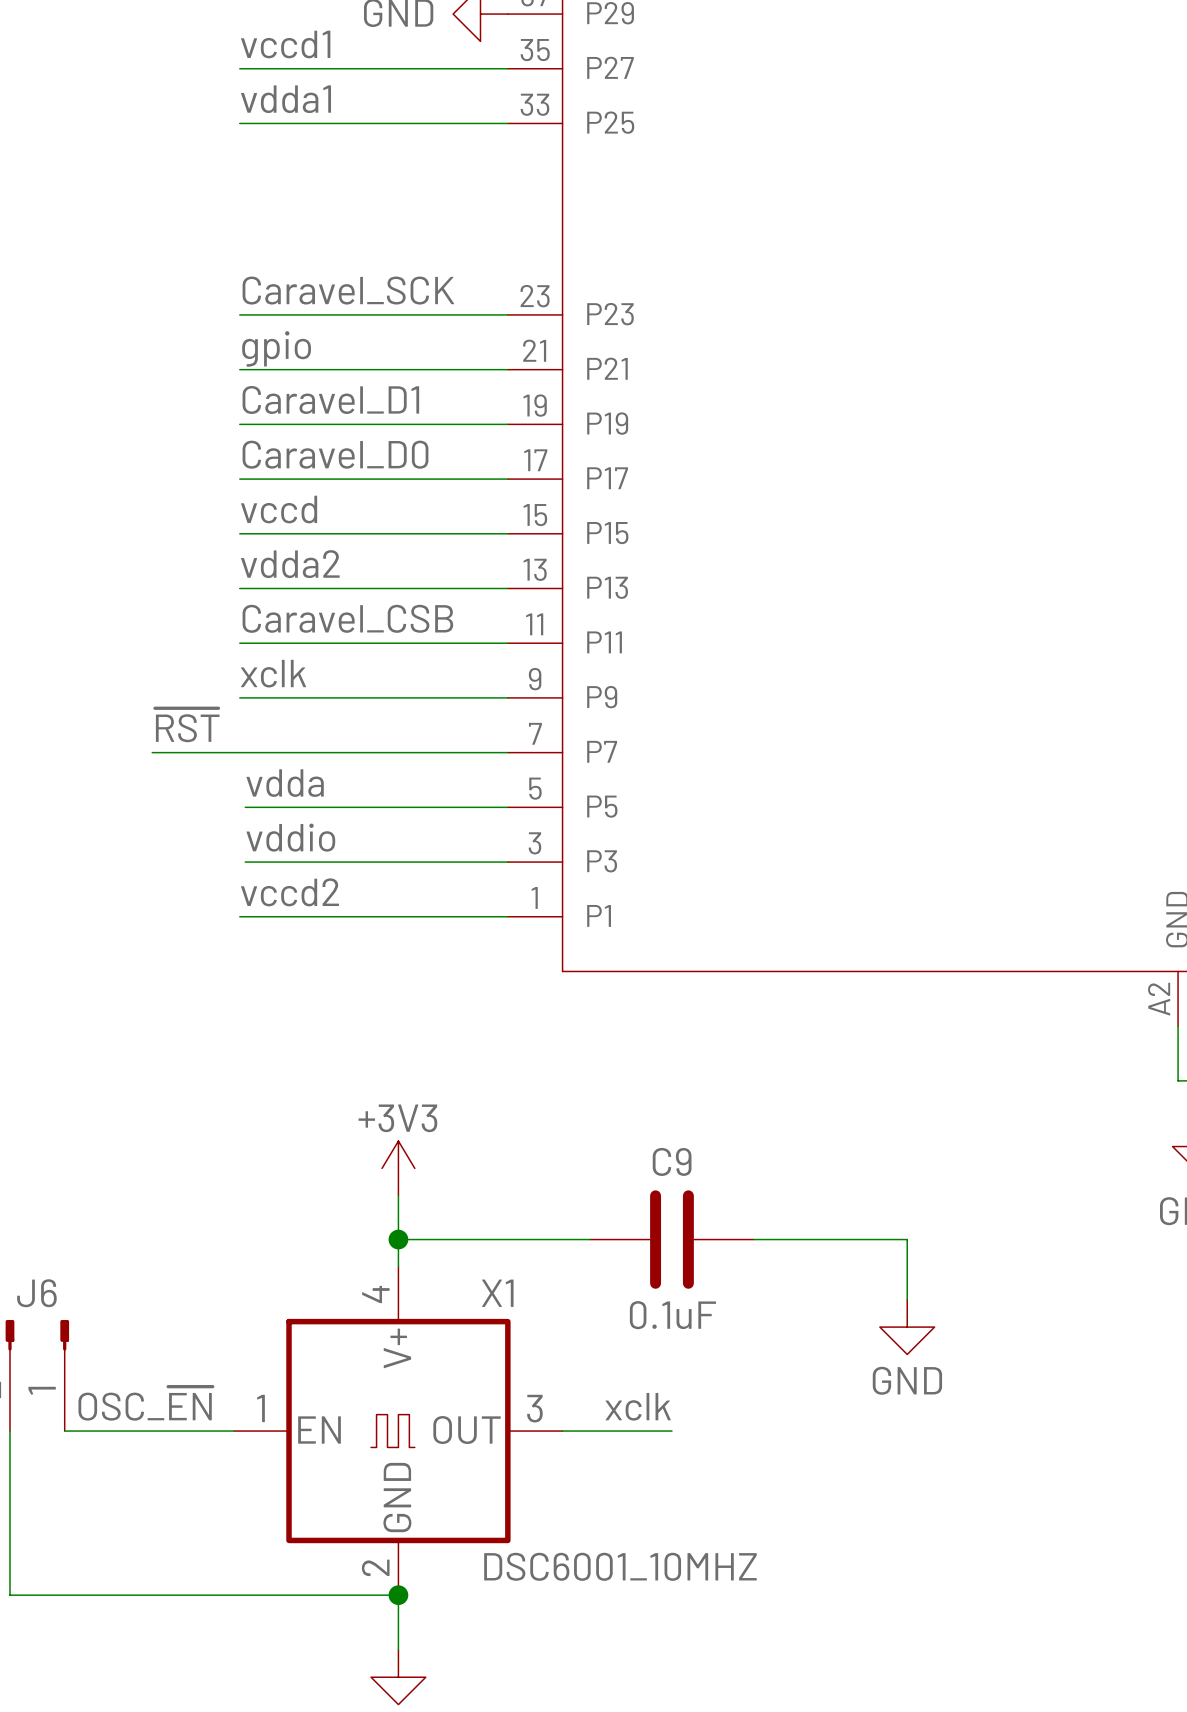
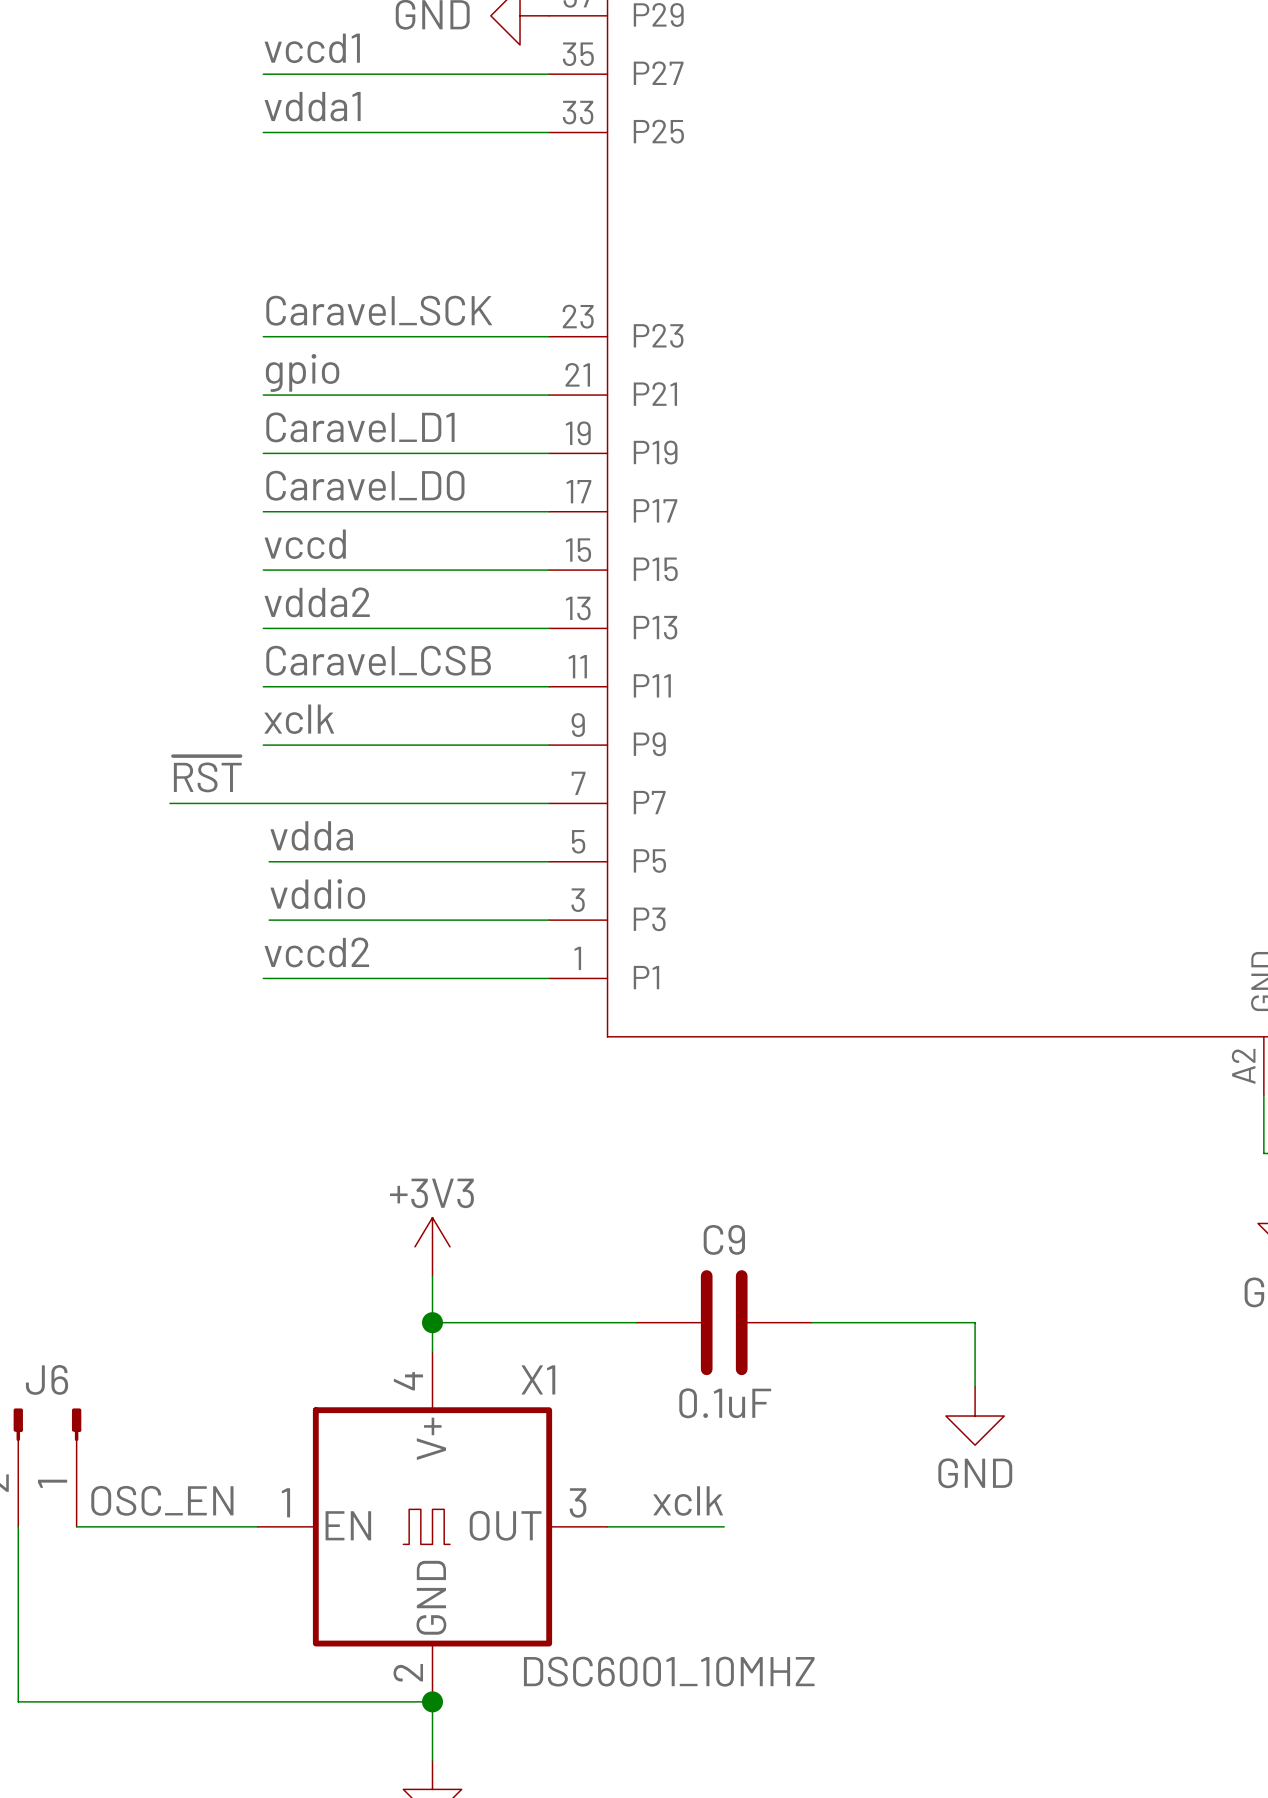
label: OSC_~{EN} (145, 1403) -> OSC_EN (162, 1500)

